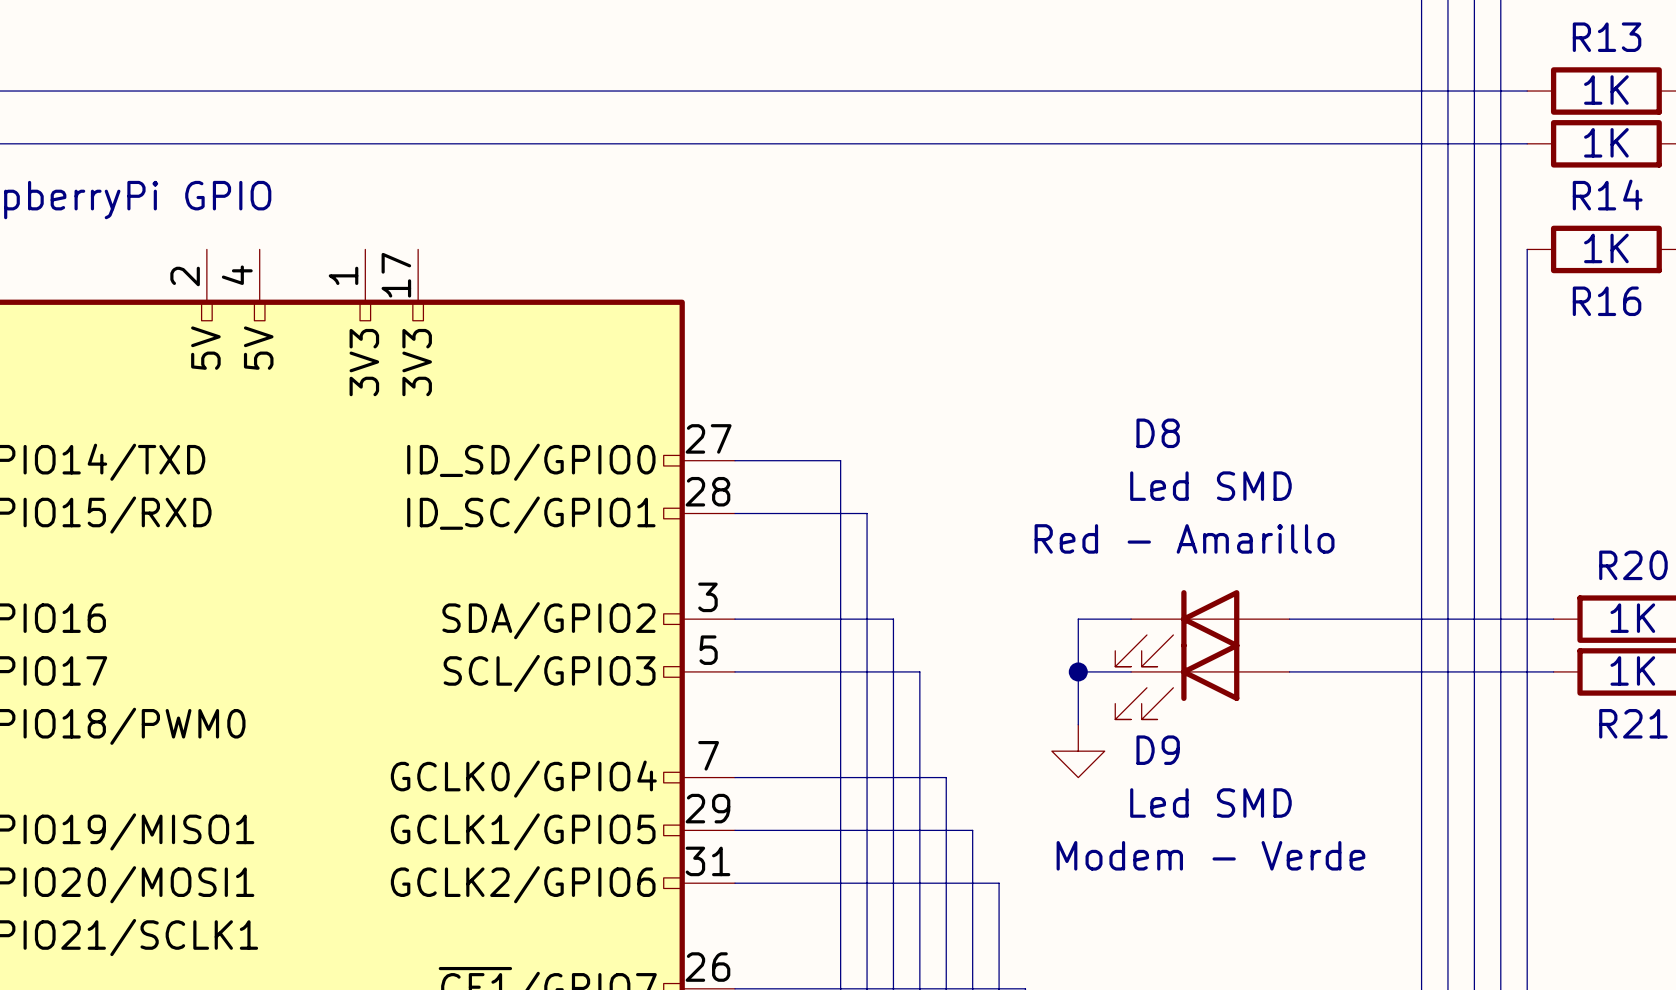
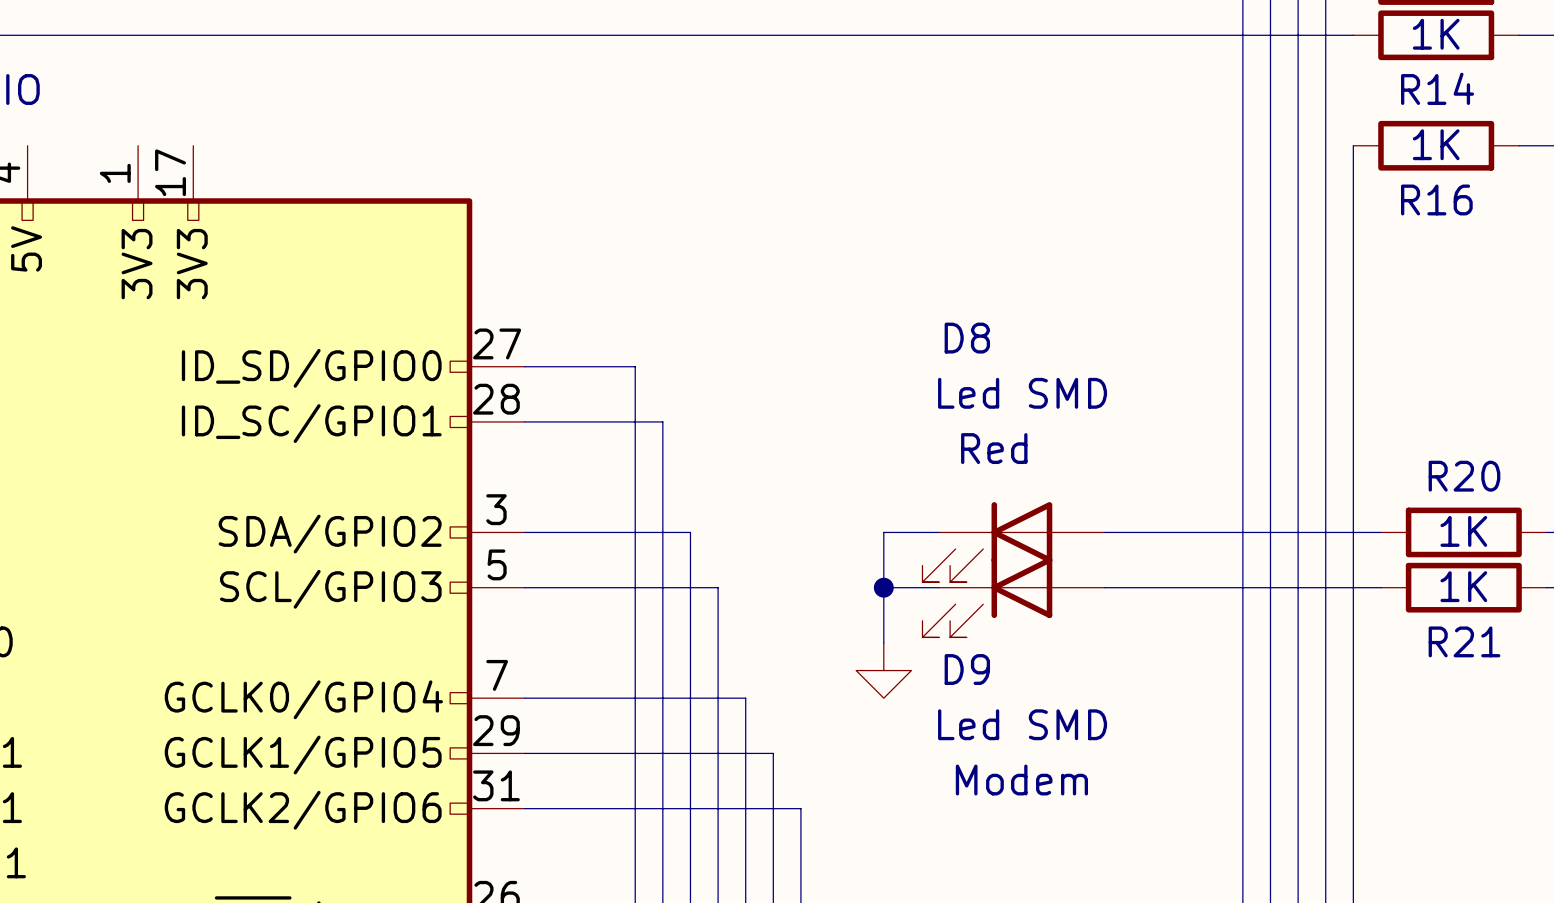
D8 text: Red - Amarillo (1184, 538) -> Red (994, 448)
D9 text: Modem - Verde (1210, 855) -> Modem (1021, 780)

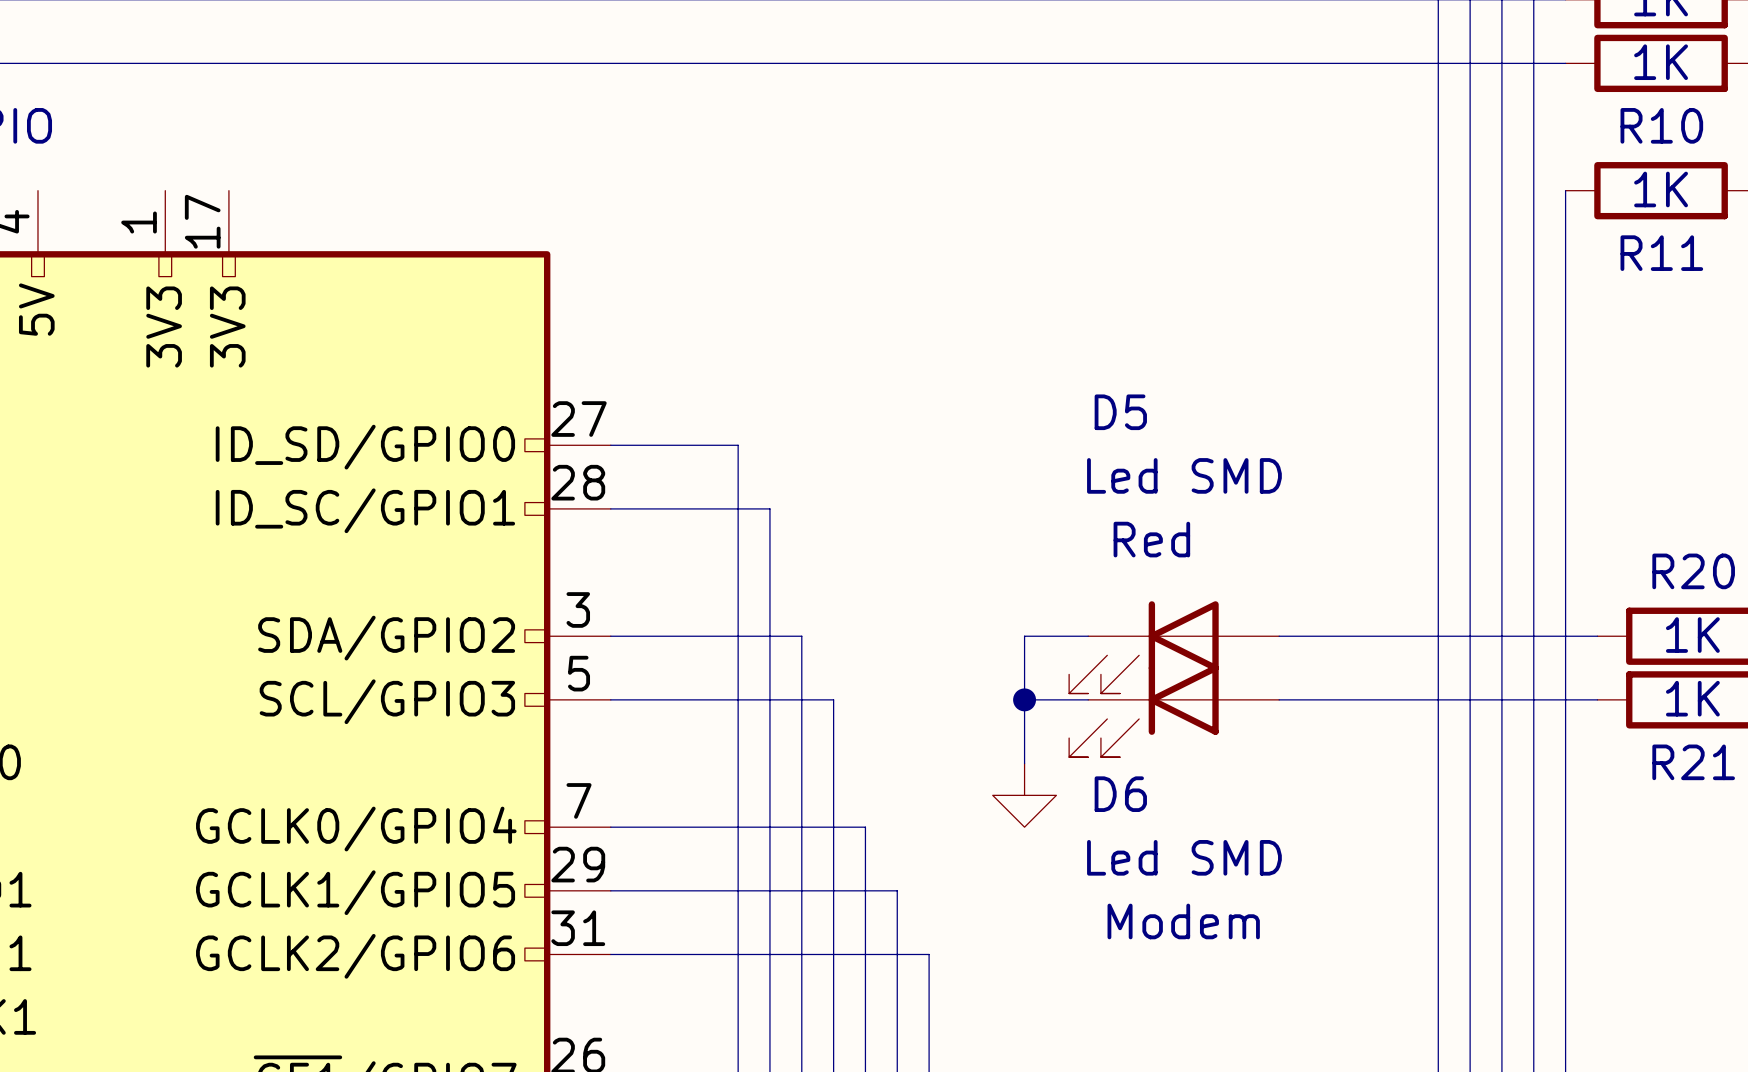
R14 name: R14 (1437, 88) -> R10 (1661, 125)
R16 name: R16 (1436, 199) -> R11 (1661, 253)
D8 name: D8 (967, 338) -> D5 (1120, 412)
D9 name: D9 (967, 669) -> D6 (1120, 794)

